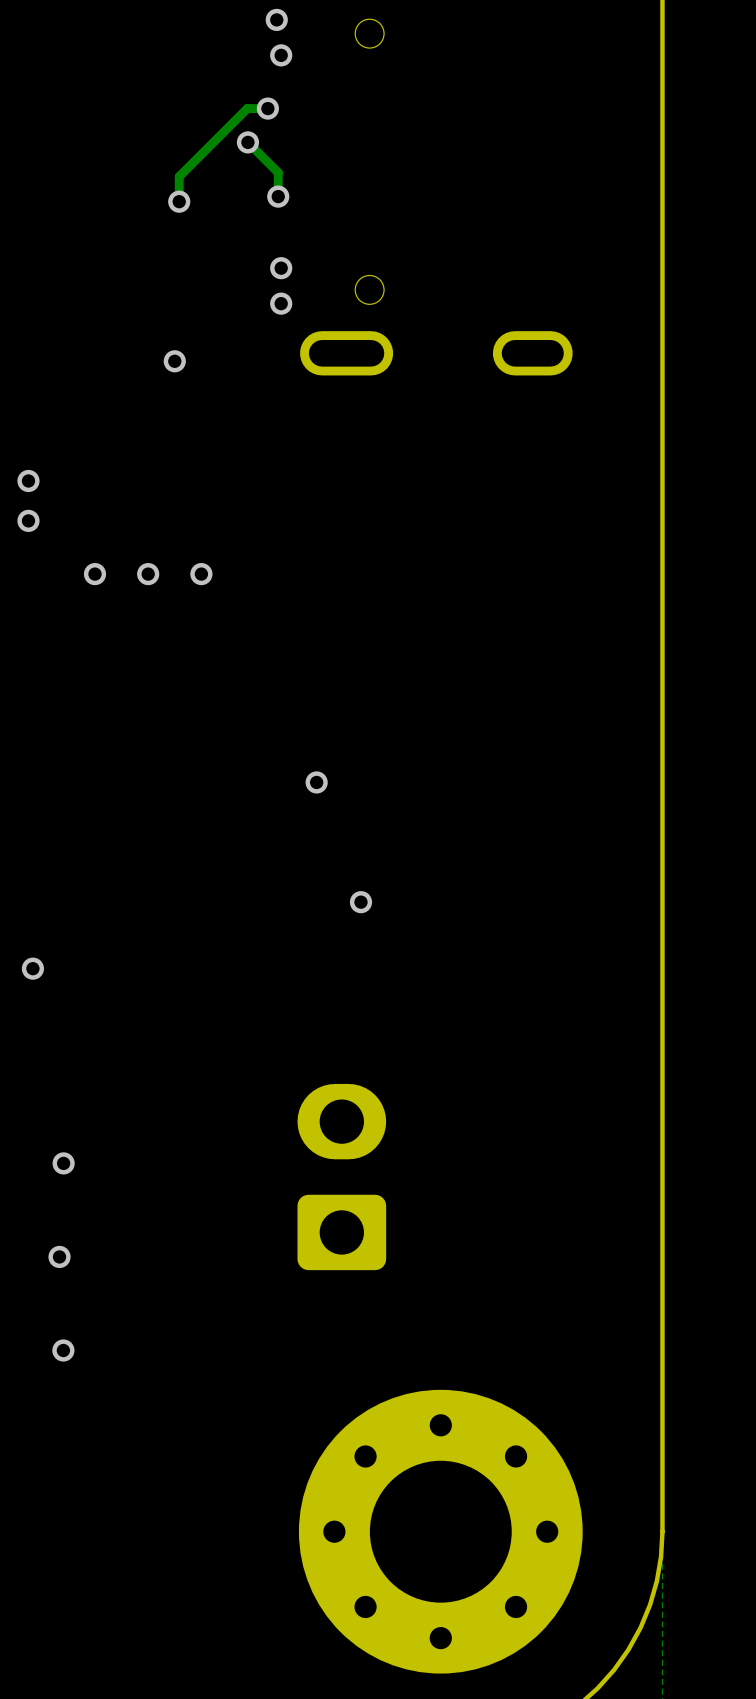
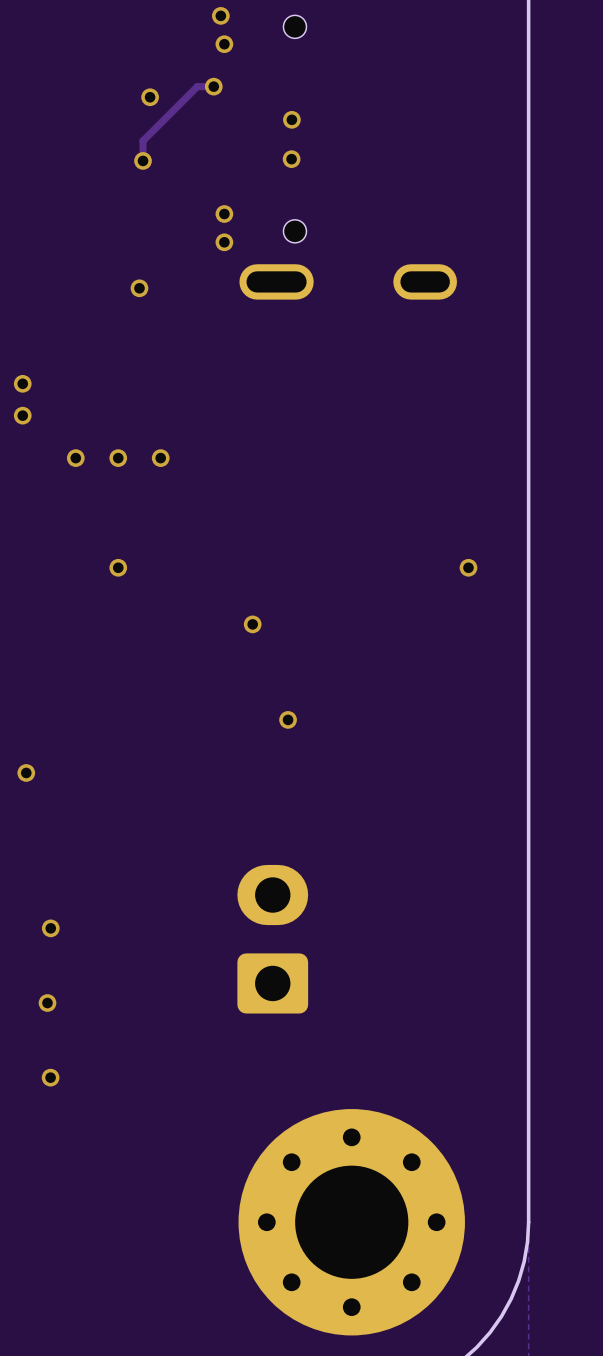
via: none -> (150, 97)
track: (247, 142) (278, 172) (278, 196) -> none
via: (247, 142) -> none
via: none -> (291, 119)
via: (278, 196) -> none
via: none -> (291, 159)
via: none -> (118, 567)
via: none -> (468, 567)

